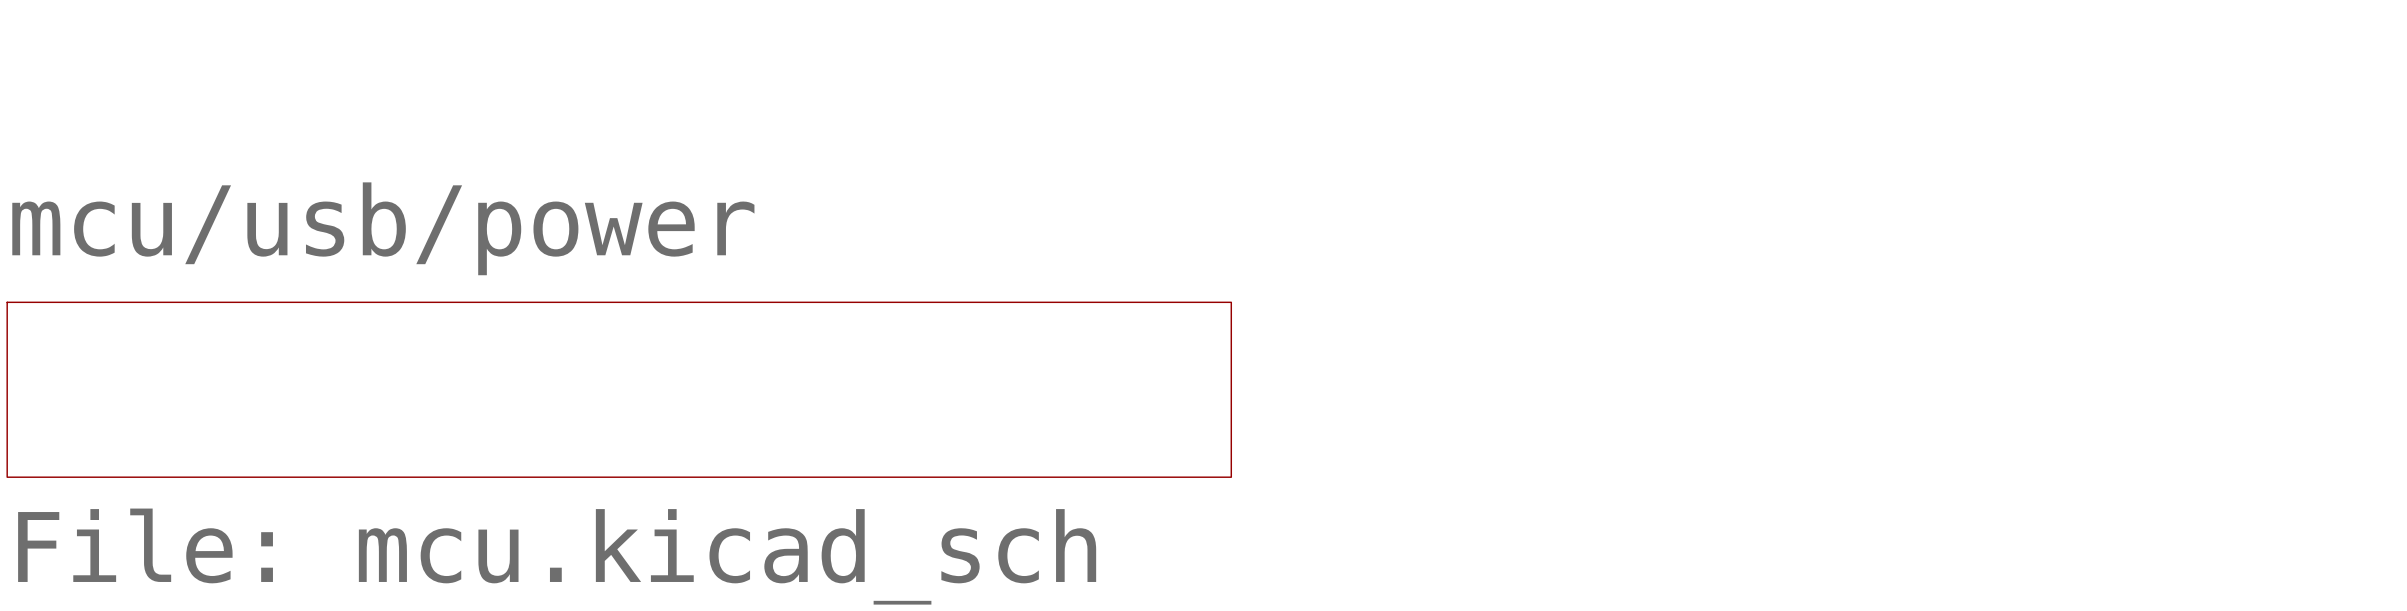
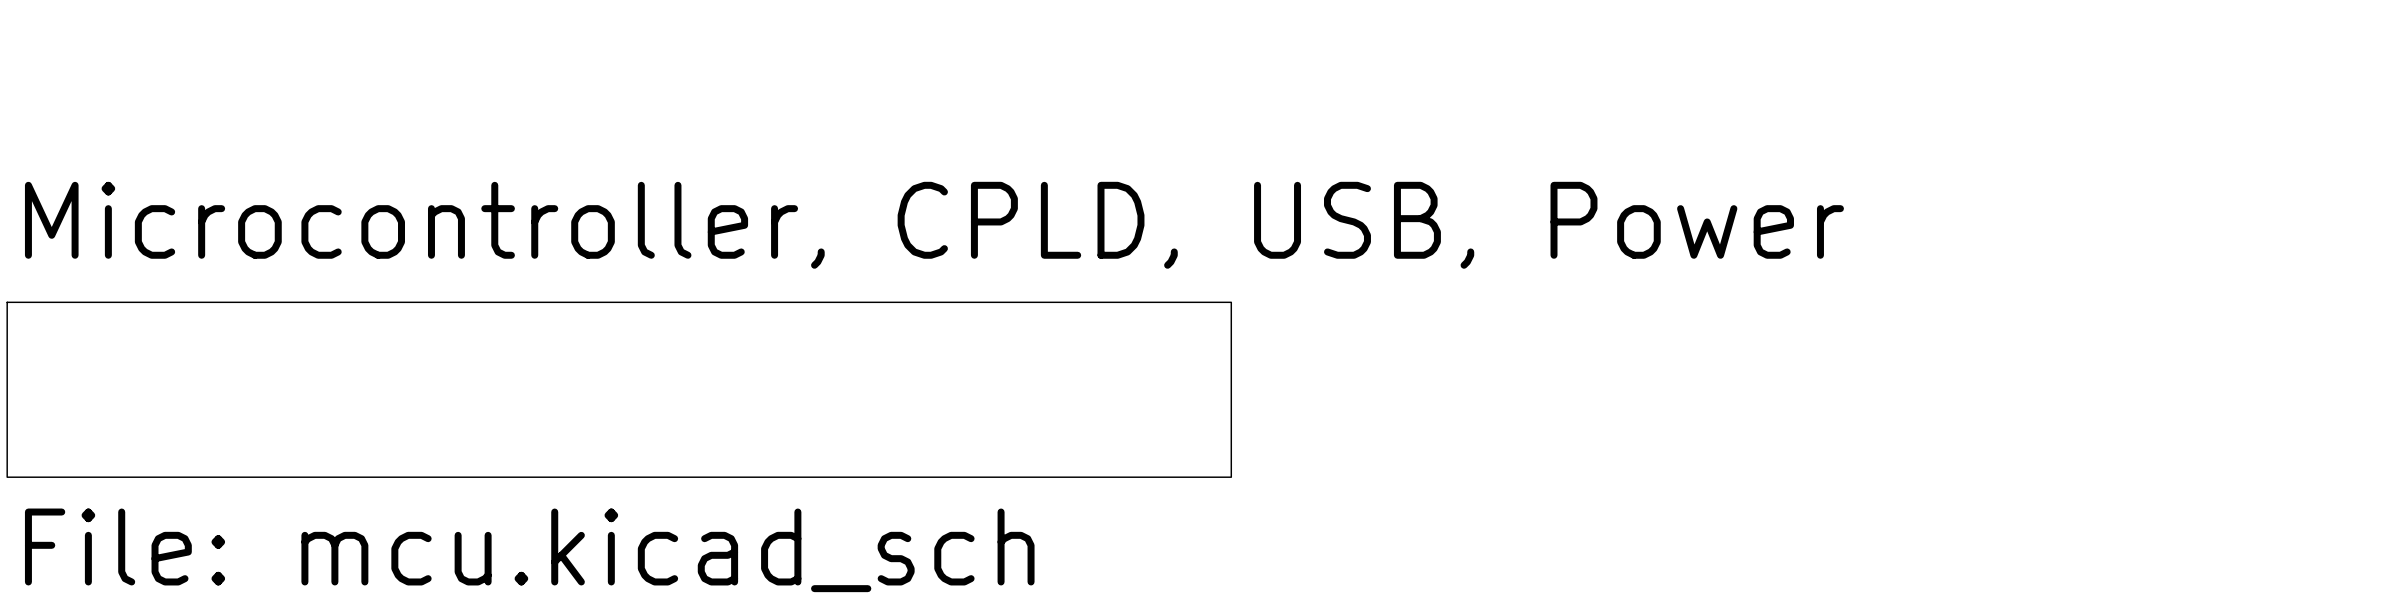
sheet mcu/usb/power name: mcu/usb/power (383, 228) -> Microcontroller, CPLD, USB, Power (934, 225)

